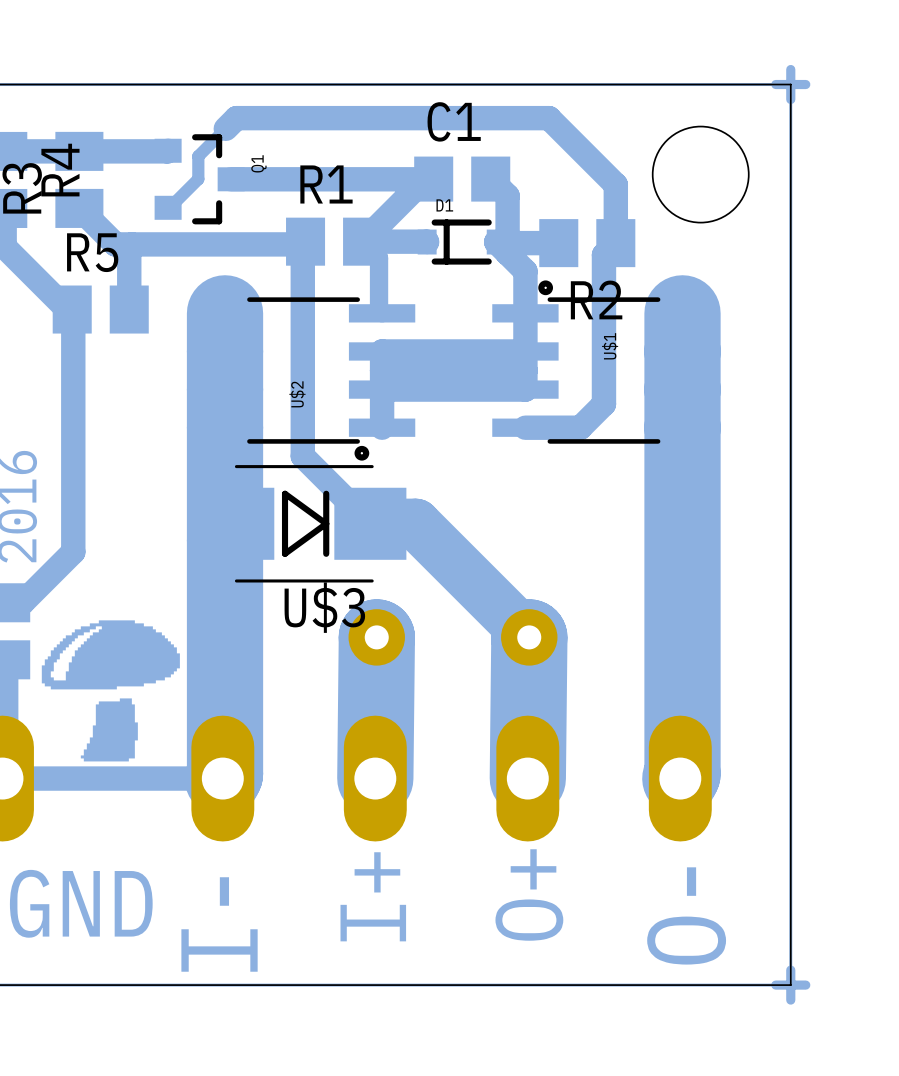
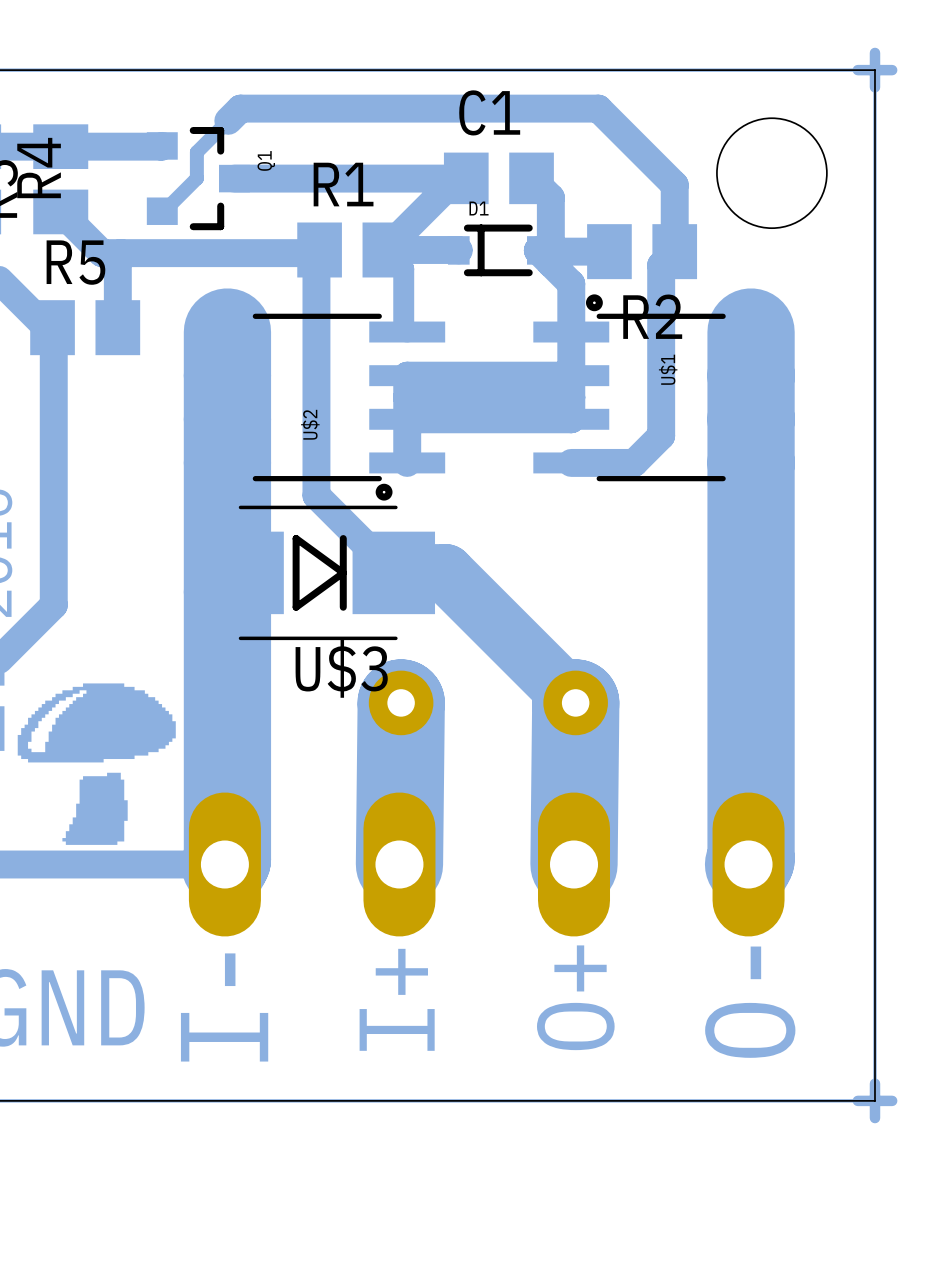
text position: O- (686, 915) -> O- (750, 1002)
text position: I- (219, 924) -> I- (224, 1007)

